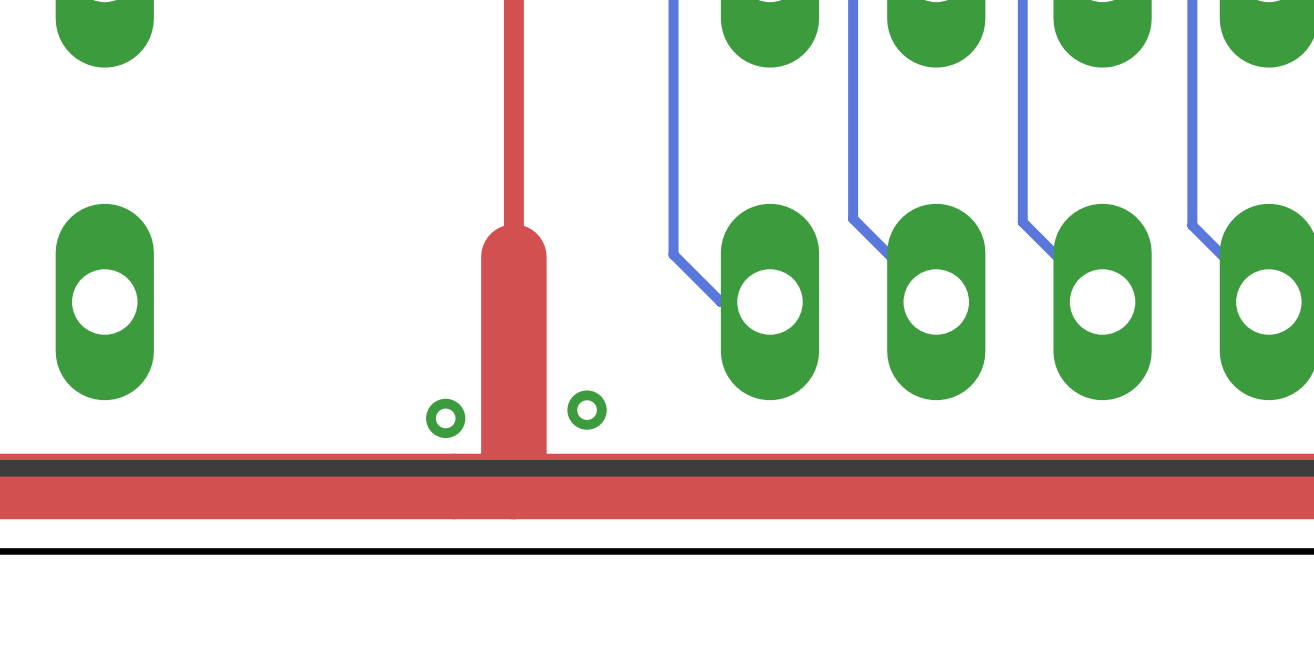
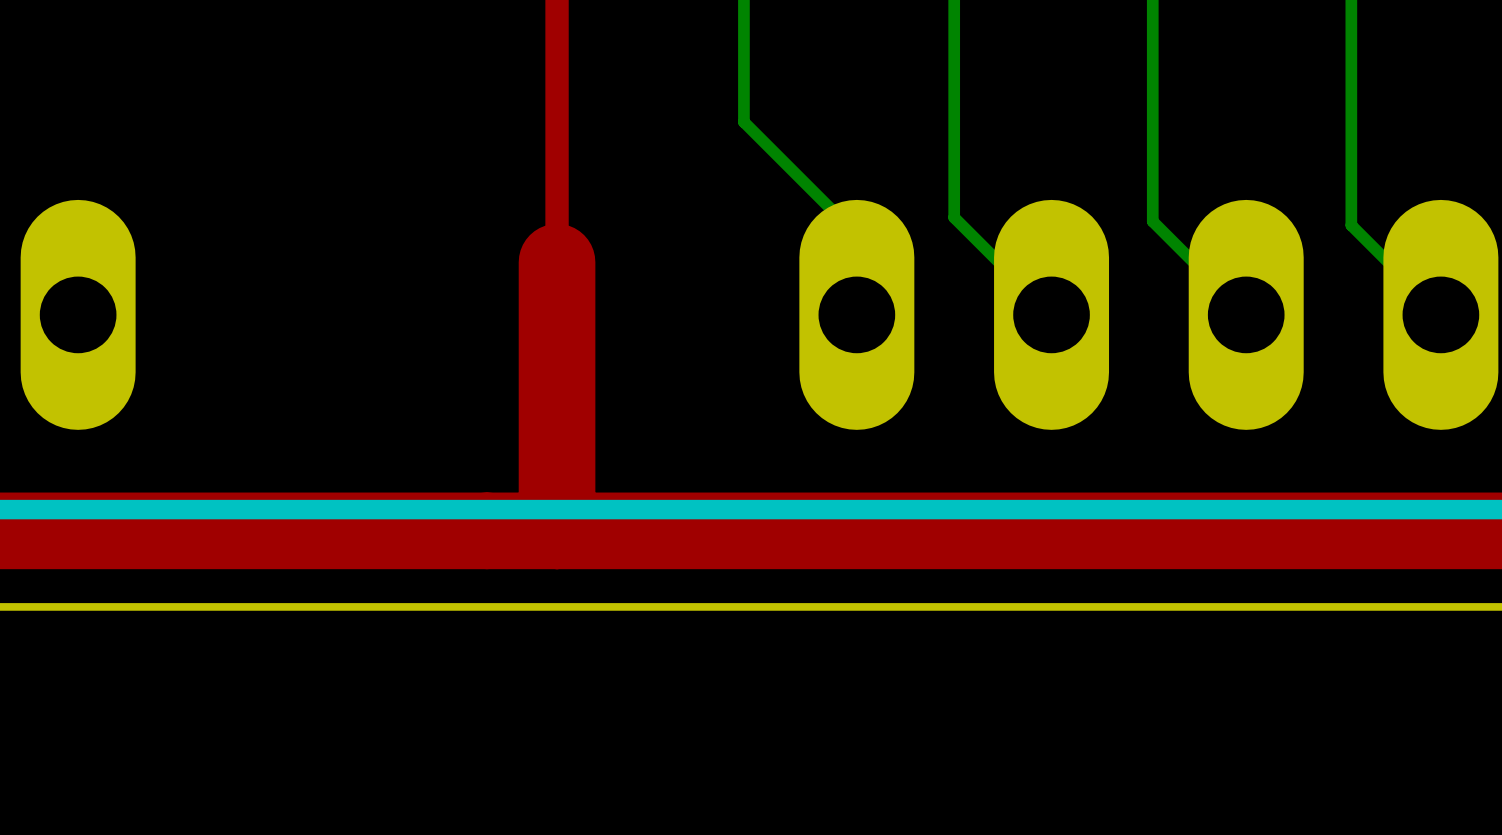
bottom track: (673, 137) (673, 254) (720, 302) (769, 302) -> (743, 122) (856, 234) (856, 314)
via: (587, 410) -> none
via: (445, 418) -> none

